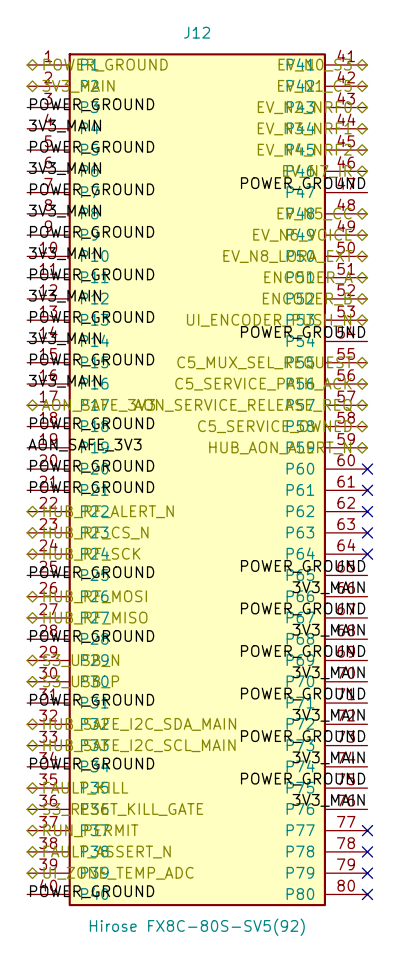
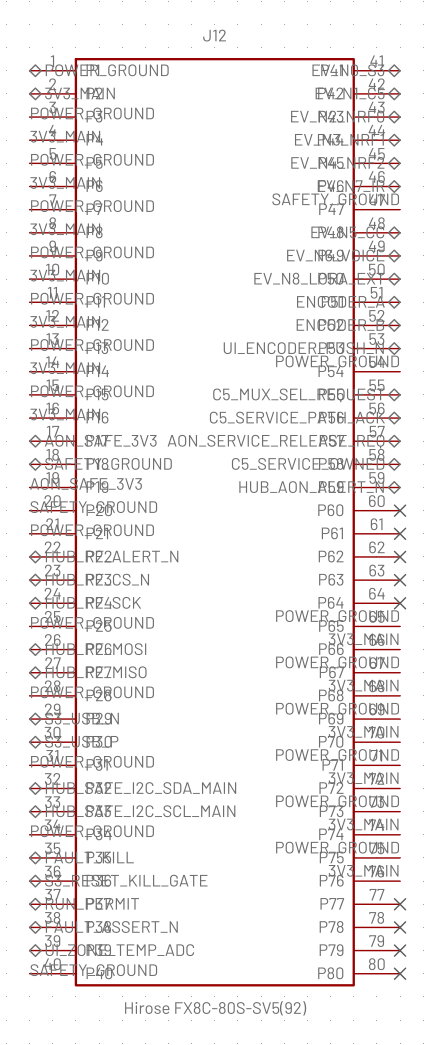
label: POWER_GROUND (303, 183) -> SAFETY_GROUND (335, 199)
label: POWER_GROUND (92, 423) -> none
hierarchical label: none -> SAFETY_GROUND (108, 463)
label: POWER_GROUND (92, 466) -> SAFETY_GROUND (93, 507)
label: POWER_GROUND (92, 891) -> SAFETY_GROUND (93, 970)

